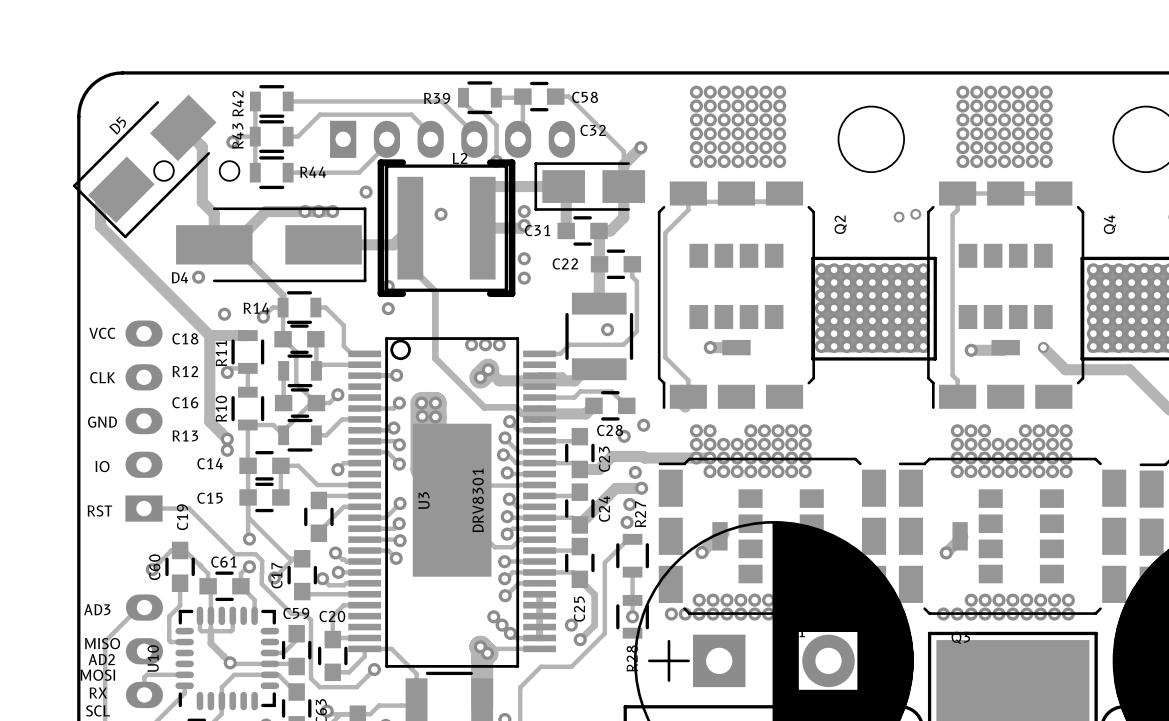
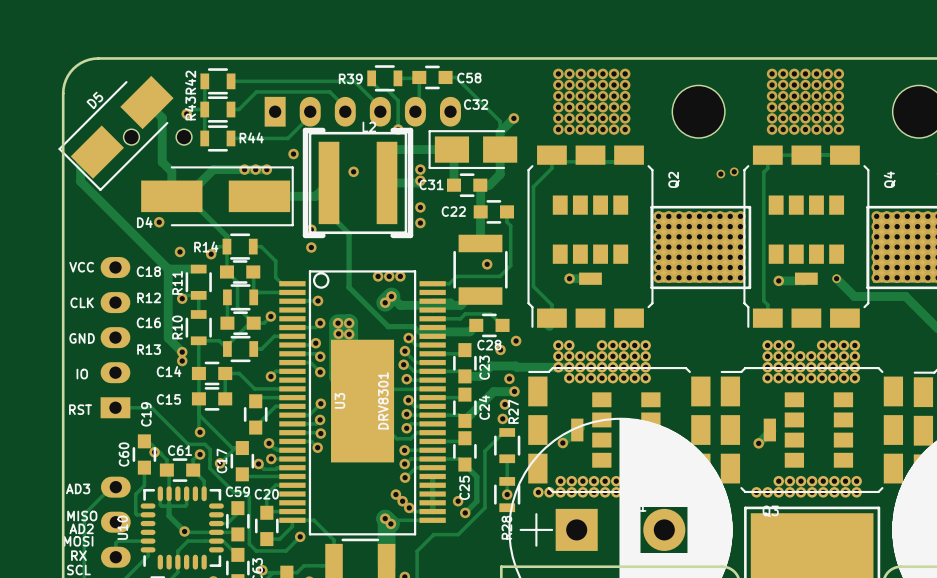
track: (180, 550) (171, 550) (152, 569) -> none
via position: (152, 569) -> (154, 452)

